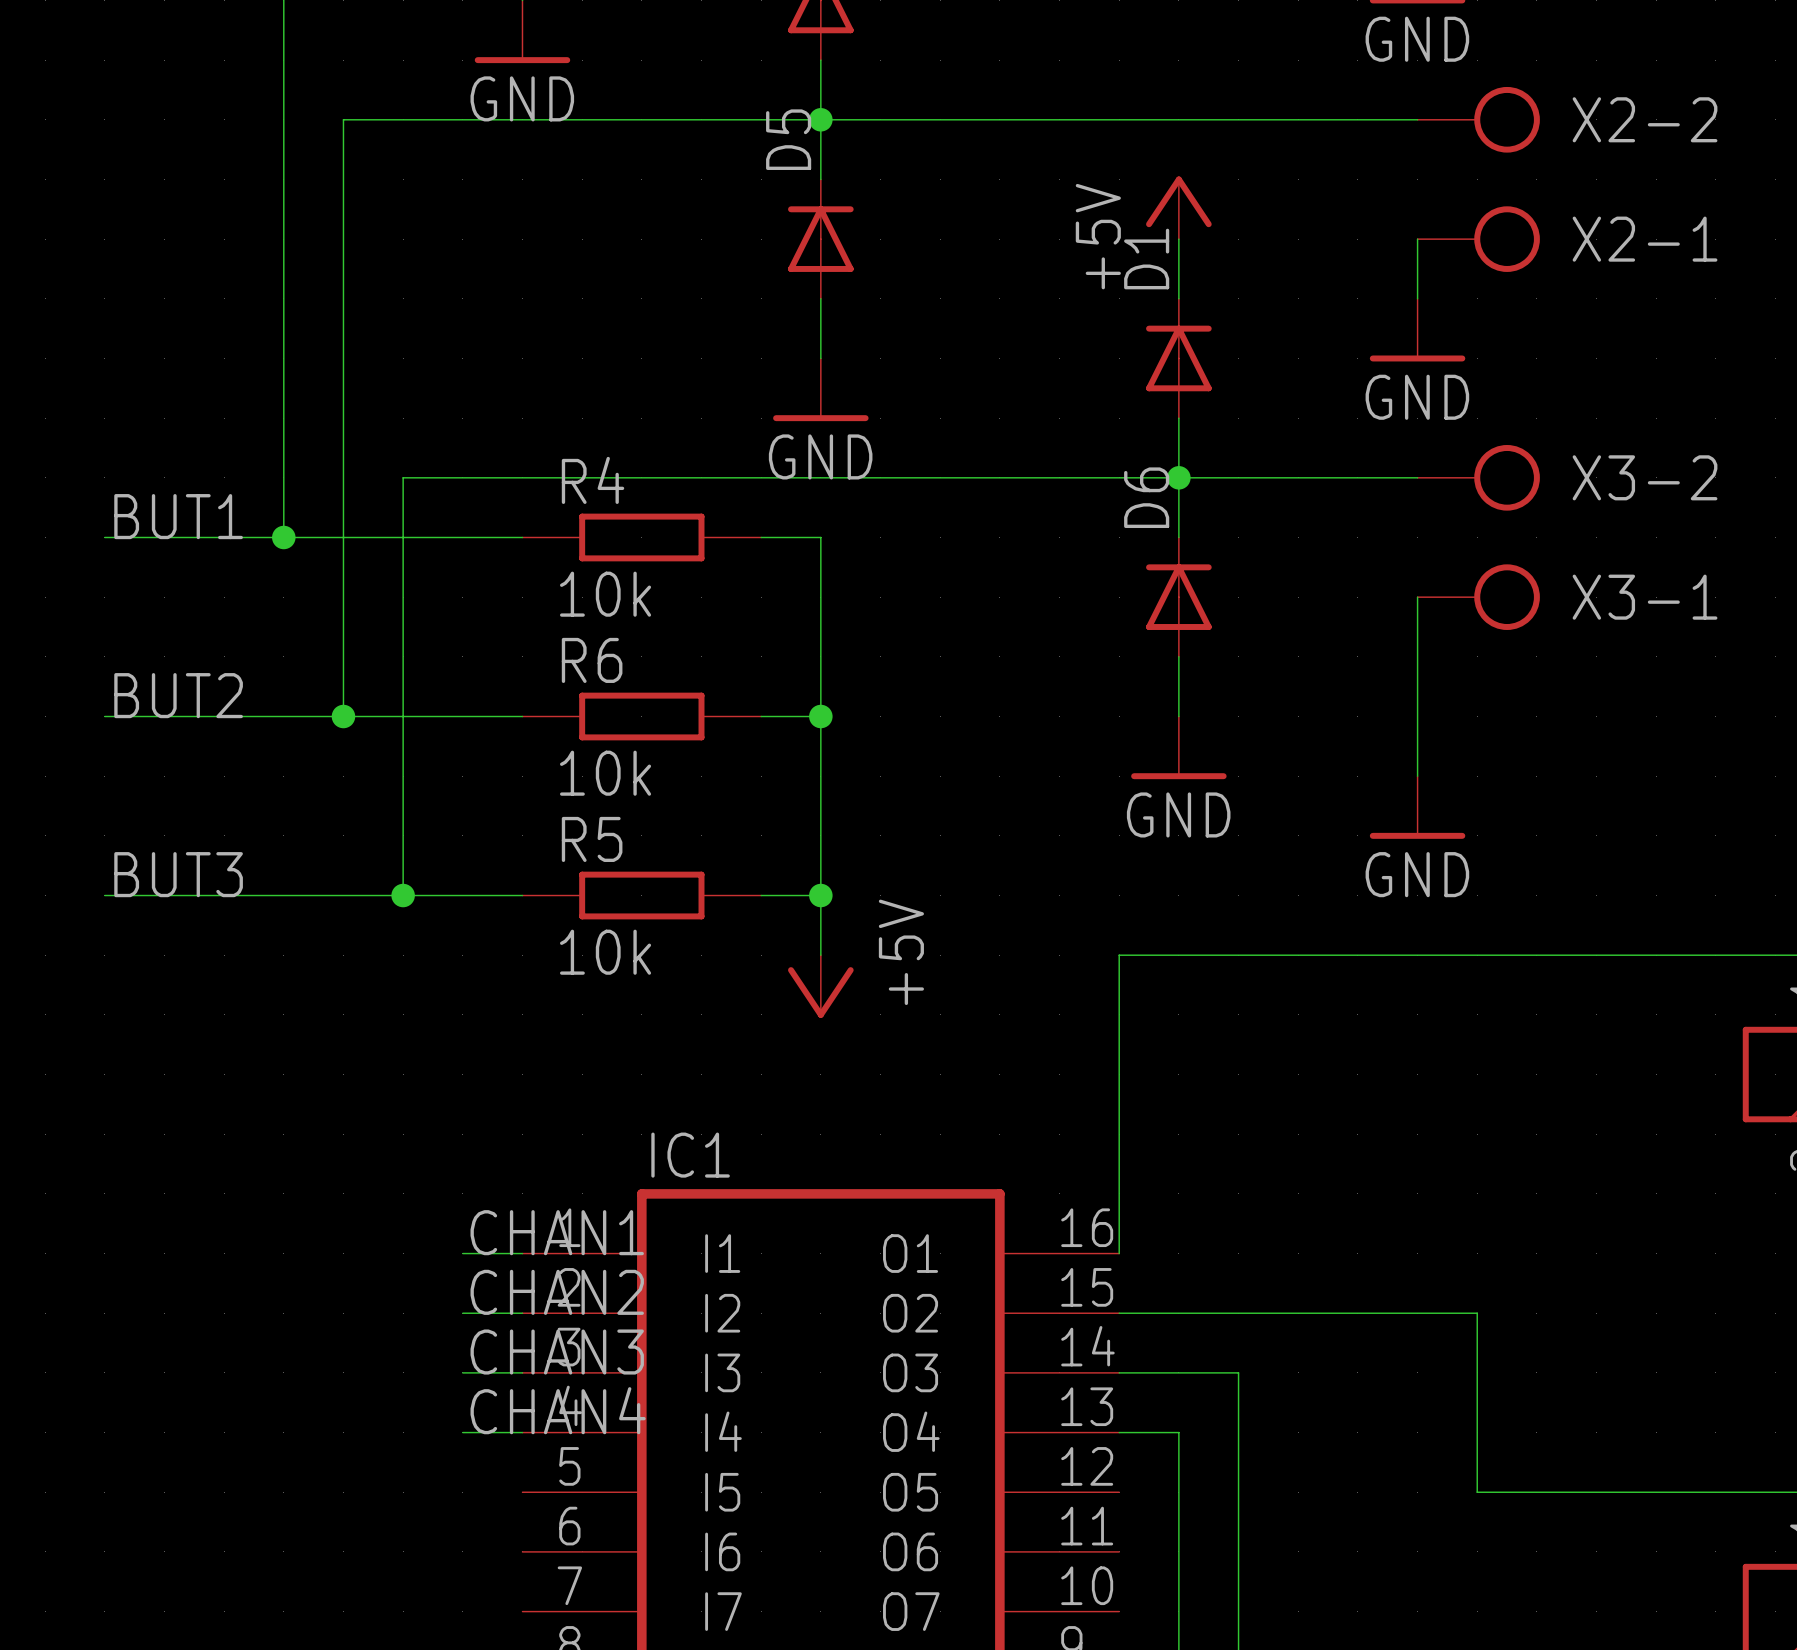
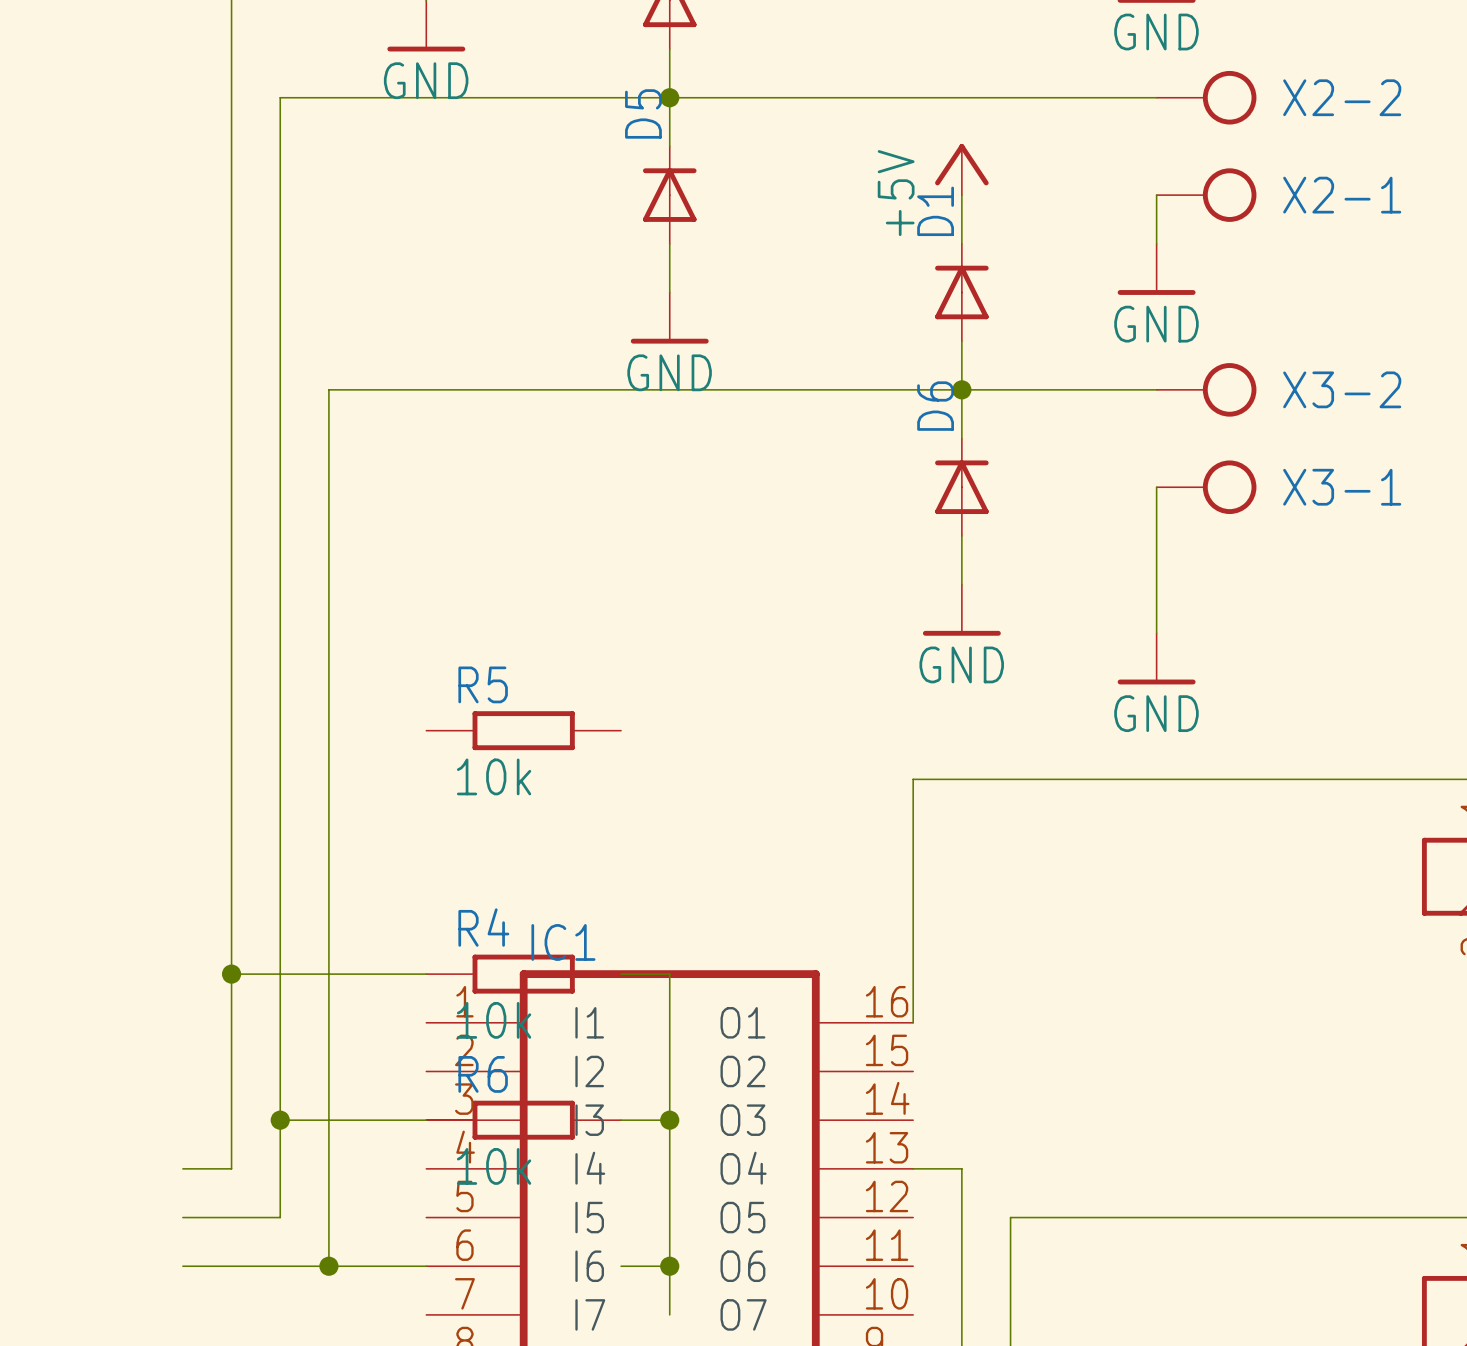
label: BUT1 (178, 516) -> none
wire: (104, 537) (522, 537) -> none
wire: none -> (231, 438) (231, 1168) (182, 1168)
junction: (283, 537) -> none
R4 position: (641, 537) -> (523, 974)
wire: (761, 537) (820, 537) (820, 955) -> none
label: BUT2 (178, 695) -> none
wire: (104, 716) (522, 716) -> none
wire: none -> (280, 584) (280, 1217) (182, 1217)
junction: (343, 716) -> none
R6 position: (641, 716) -> (523, 1120)
wire: (761, 716) (820, 716) -> none
junction: (820, 716) -> none
label: BUT3 (178, 874) -> none
wire: (104, 895) (522, 895) -> none
wire: none -> (328, 730) (328, 1266)
junction: (403, 895) -> none
wire: (761, 895) (820, 895) -> none
junction: (820, 895) -> none
power symbol: +5V (820, 986) -> none
wire: none -> (231, 974) (426, 974)
junction: none -> (231, 974)
wire: none -> (621, 974) (669, 974) (669, 1314)
label: CHAN1 (557, 1232) -> none
wire: (462, 1253) (522, 1253) -> (621, 1120) (669, 1120)
label: CHAN2 (557, 1292) -> none
wire: (462, 1313) (522, 1313) -> none
wire: (1119, 1313) (1477, 1313) (1477, 1492) -> (1010, 1217) (1205, 1217)
label: CHAN3 (557, 1352) -> none
wire: none -> (280, 1120) (377, 1120)
junction: none -> (280, 1120)
junction: none -> (669, 1120)
wire: (1119, 1372) (1238, 1372) (1238, 1492) -> none
label: CHAN4 (558, 1410) -> none
wire: (462, 1432) (522, 1432) -> (621, 1266) (669, 1266)
wire: none -> (182, 1266) (426, 1266)
junction: none -> (328, 1266)
junction: none -> (669, 1266)

